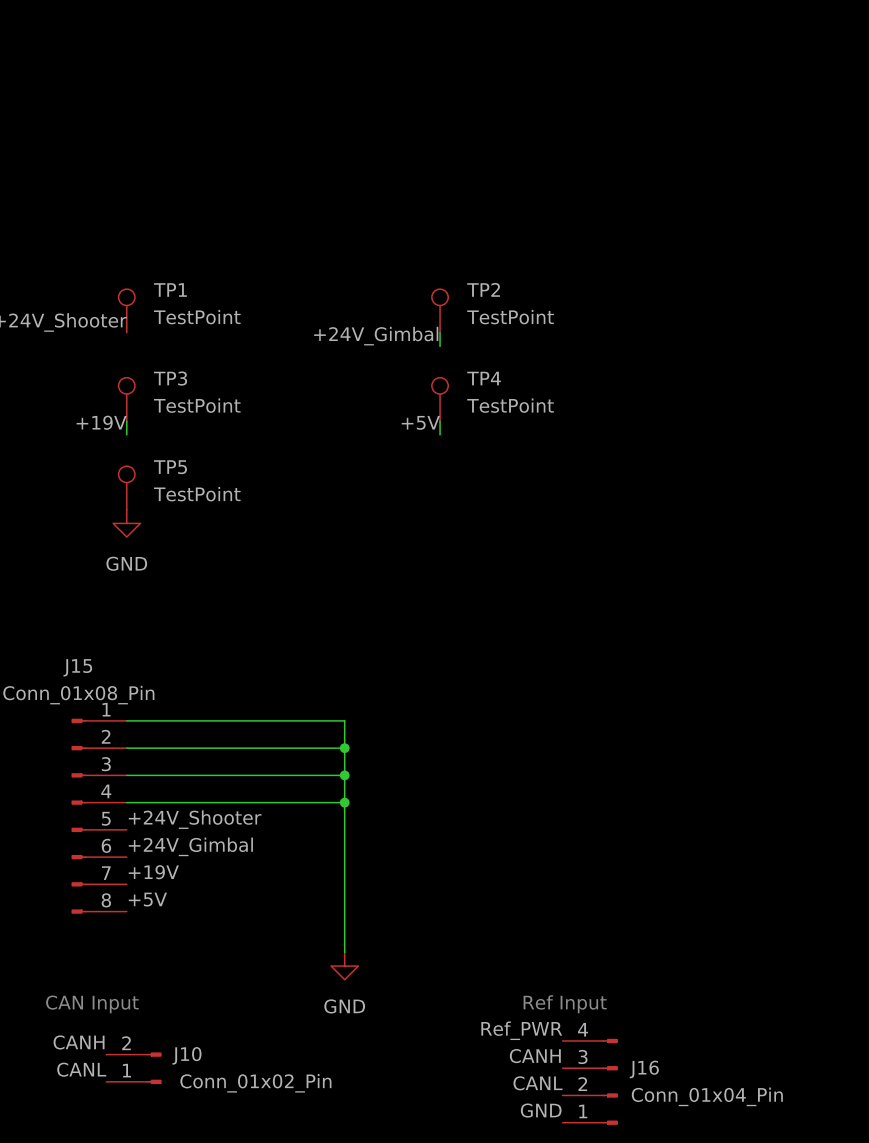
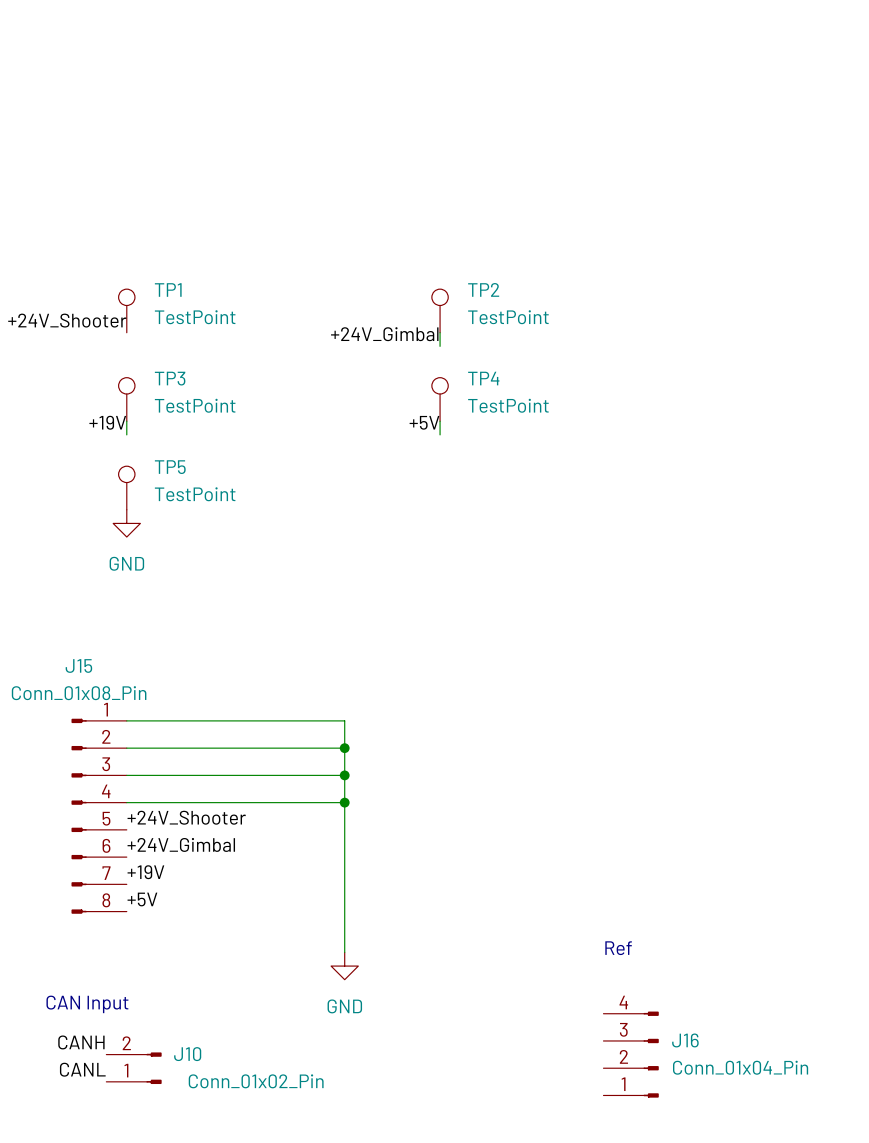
text: none -> Ref (618, 948)
text: Ref Input (565, 1004) -> none
label: Ref_PWR (521, 1030) -> none
label: CANH (535, 1056) -> none
J16 position: (590, 1081) -> (631, 1054)
label: CANL (538, 1083) -> none
label: GND (541, 1110) -> none

